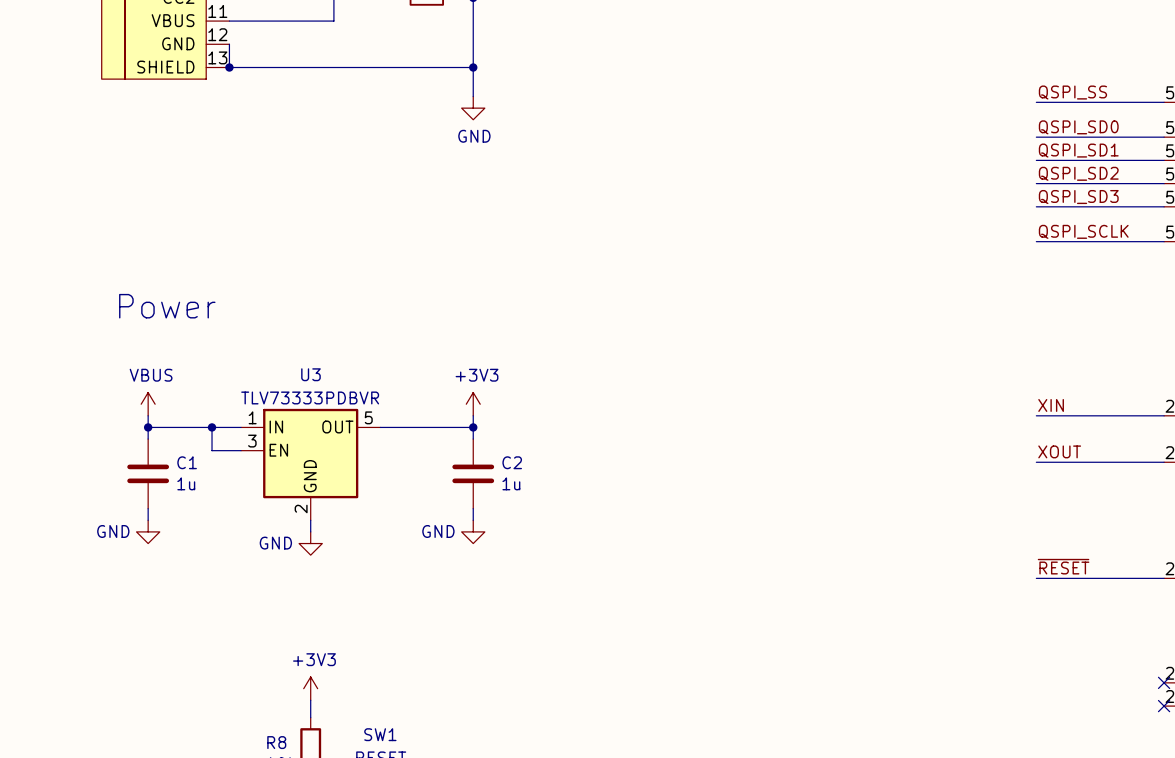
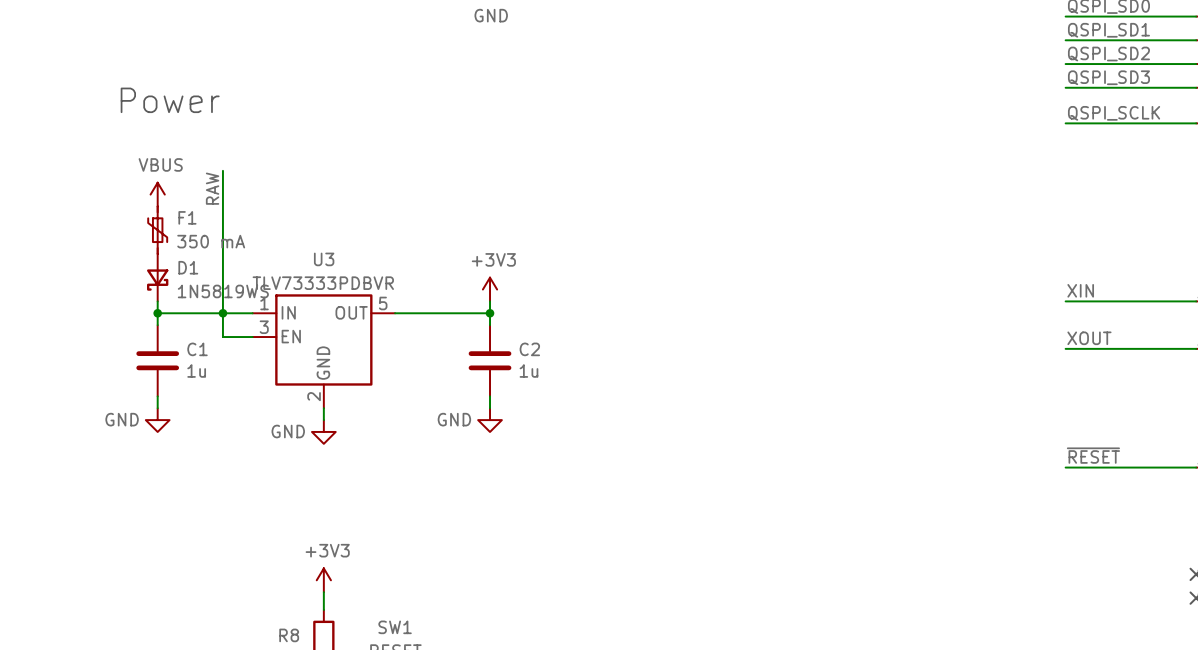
wire: none -> (222, 170) (222, 313)
label: none -> RAW (212, 188)
text position: Power (167, 306) -> Power (170, 100)
F1: none -> 350 mA (157, 230)
D1: none -> 1N5819WS (157, 277)
power symbol position: VBUS (148, 404) -> VBUS (157, 194)

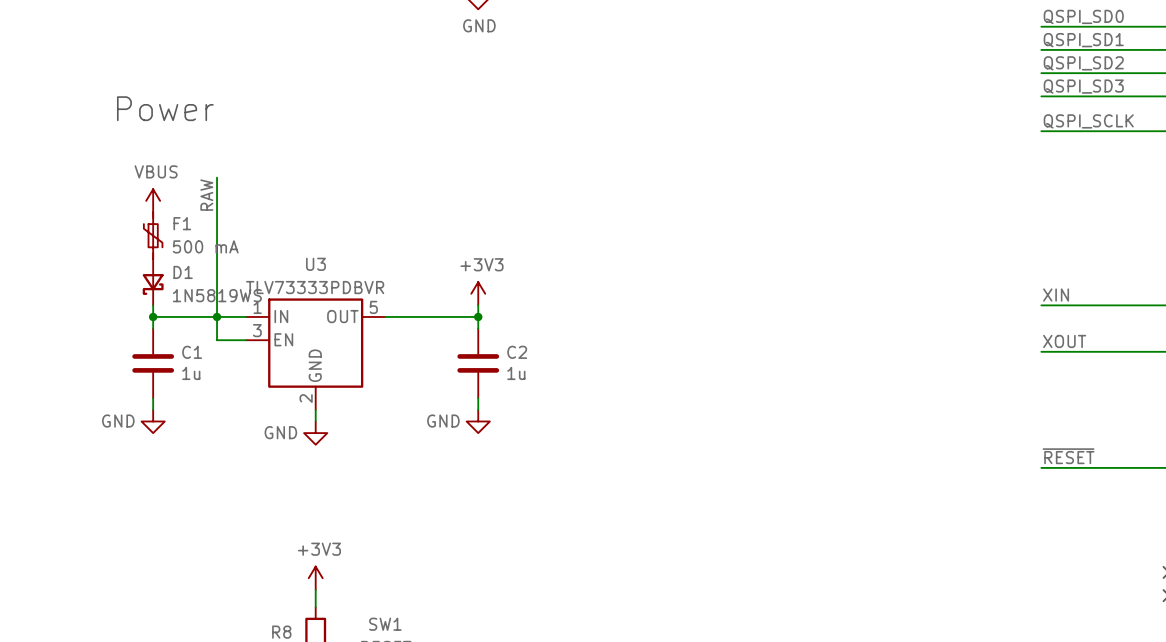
F1 value: 350 mA (211, 241) -> 500 mA (205, 246)

